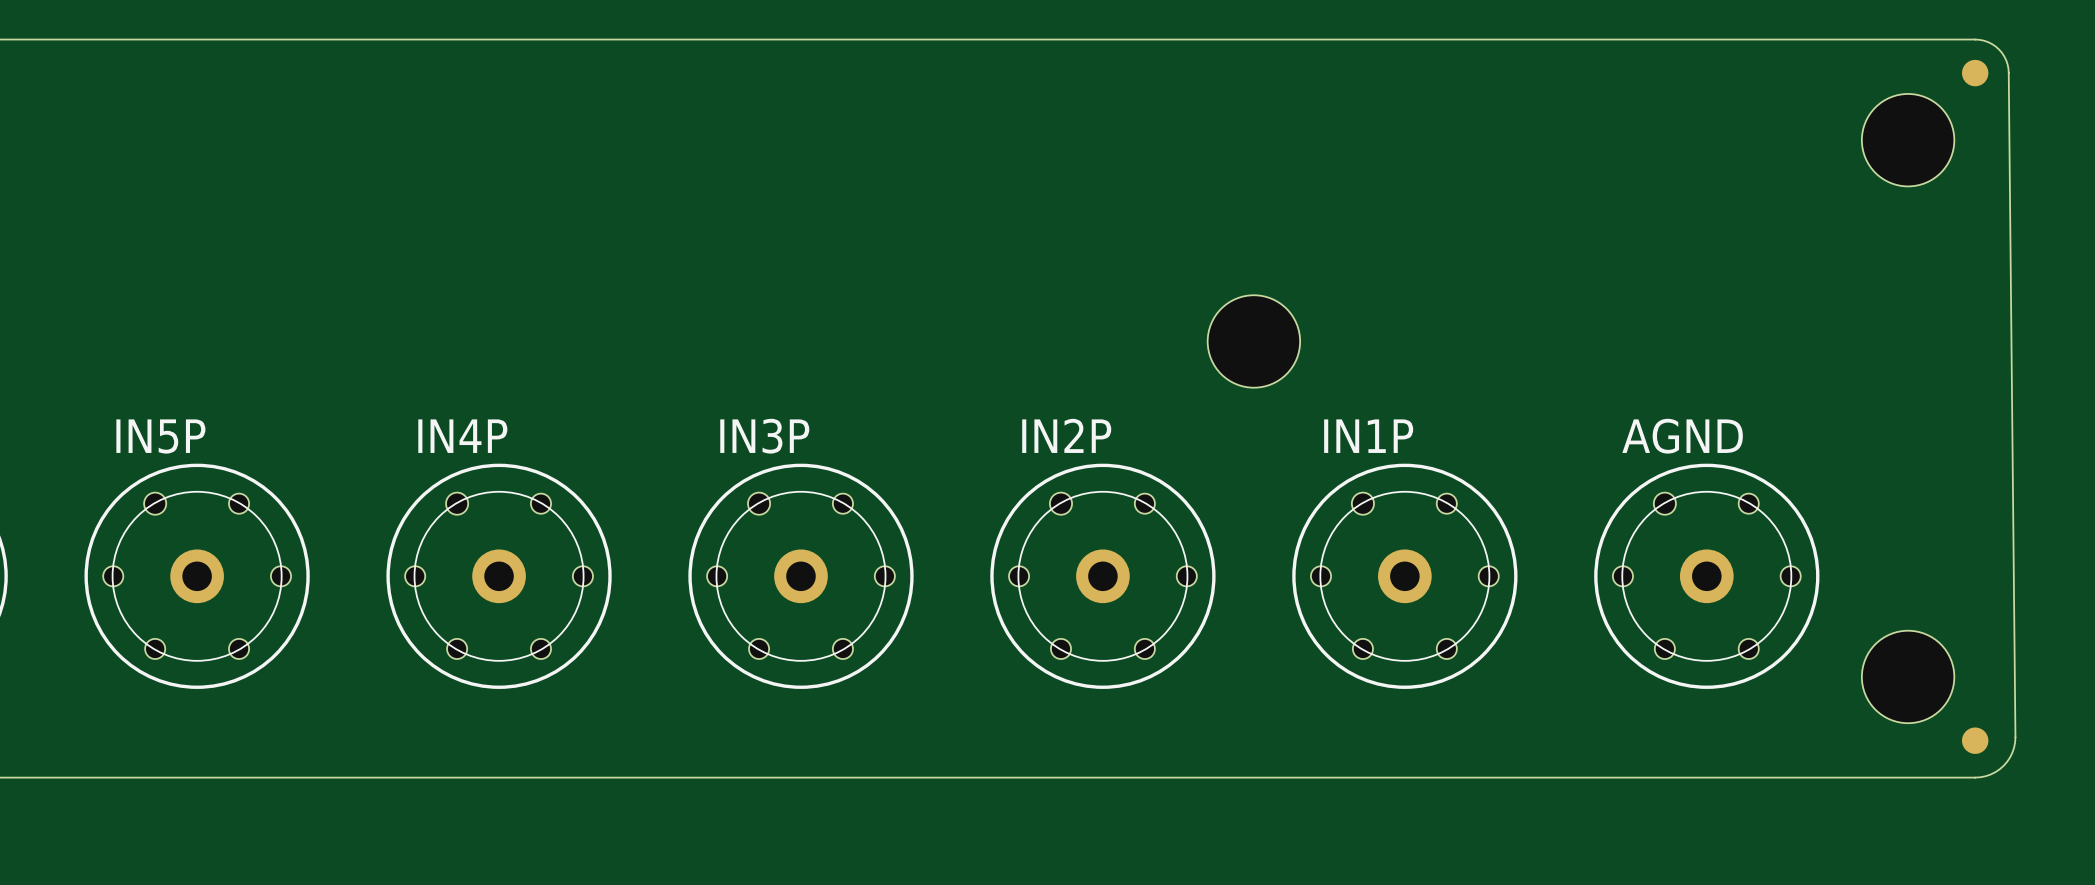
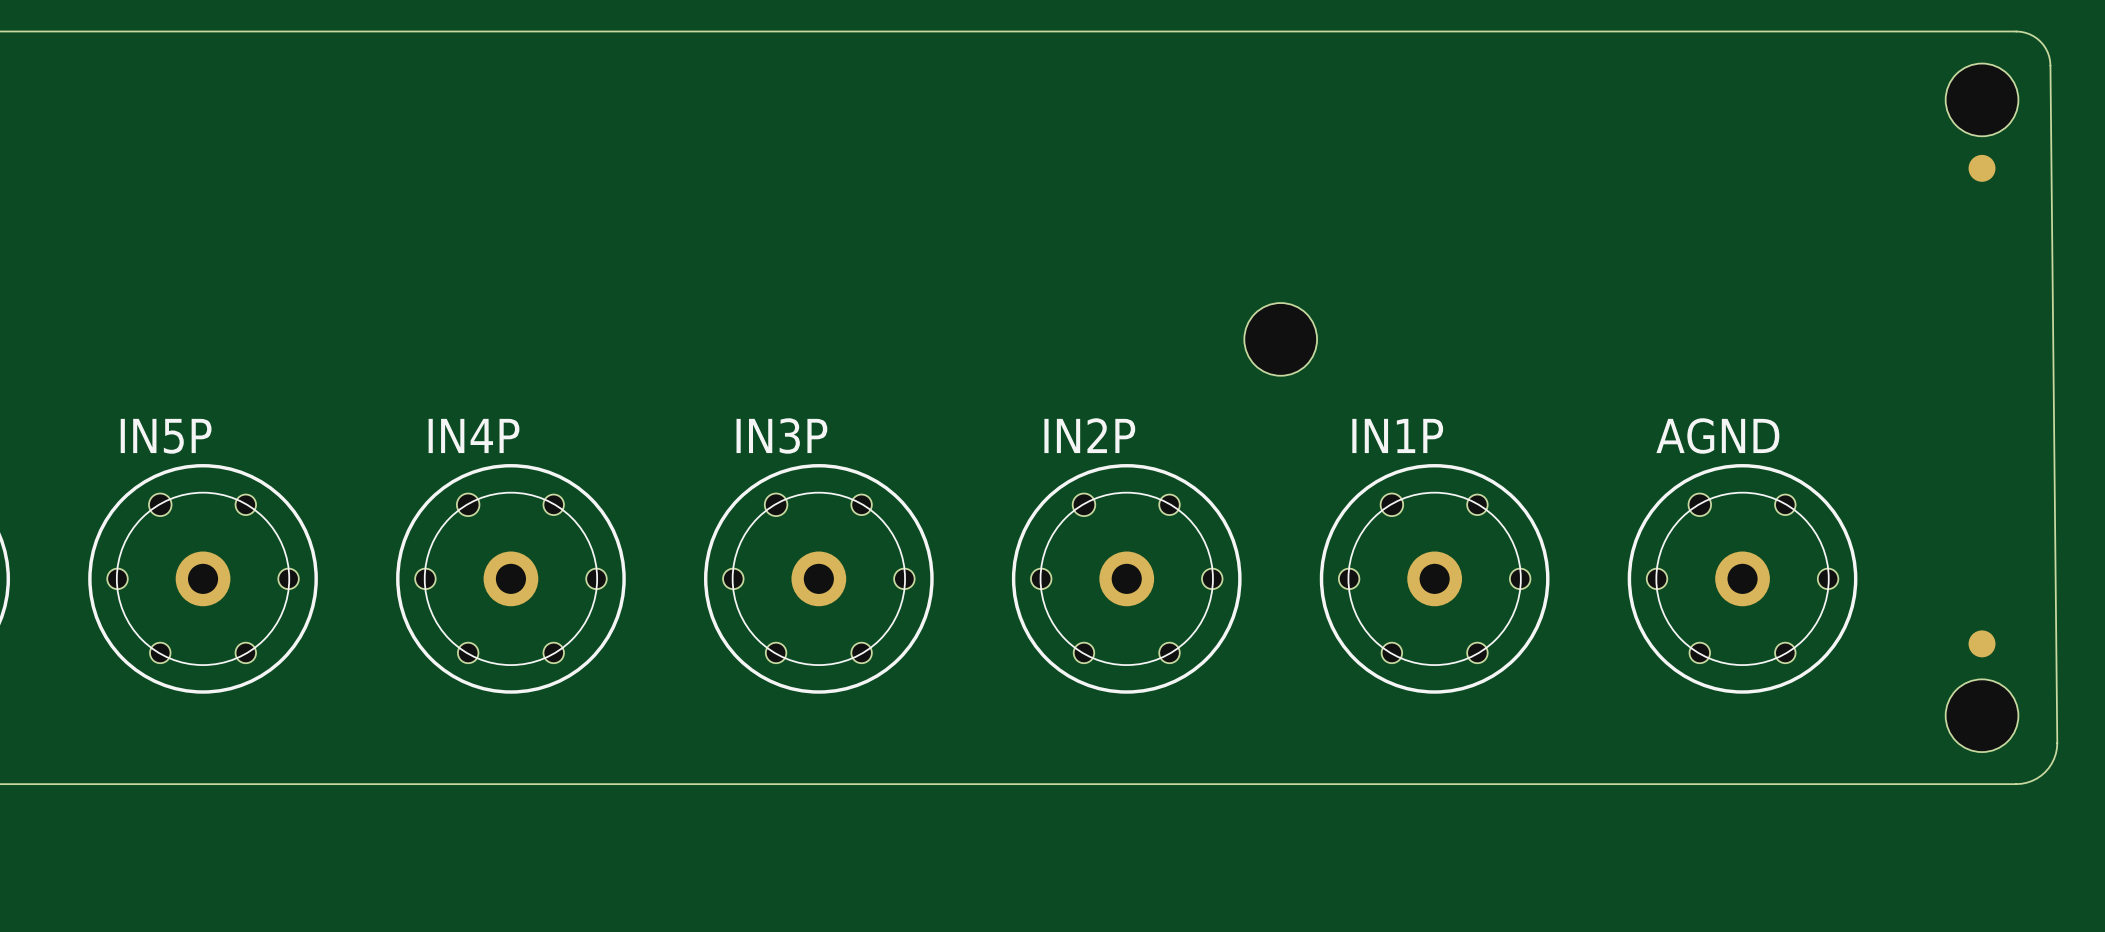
part position: (1975, 73) -> (1982, 168)
hole: none -> (1982, 99)
hole: (1908, 140) -> none
hole size: [1207, 295, 1301, 388] -> [1244, 303, 1318, 376]
hole: (1908, 676) -> none
hole: none -> (1982, 715)
part position: (1975, 740) -> (1982, 643)

